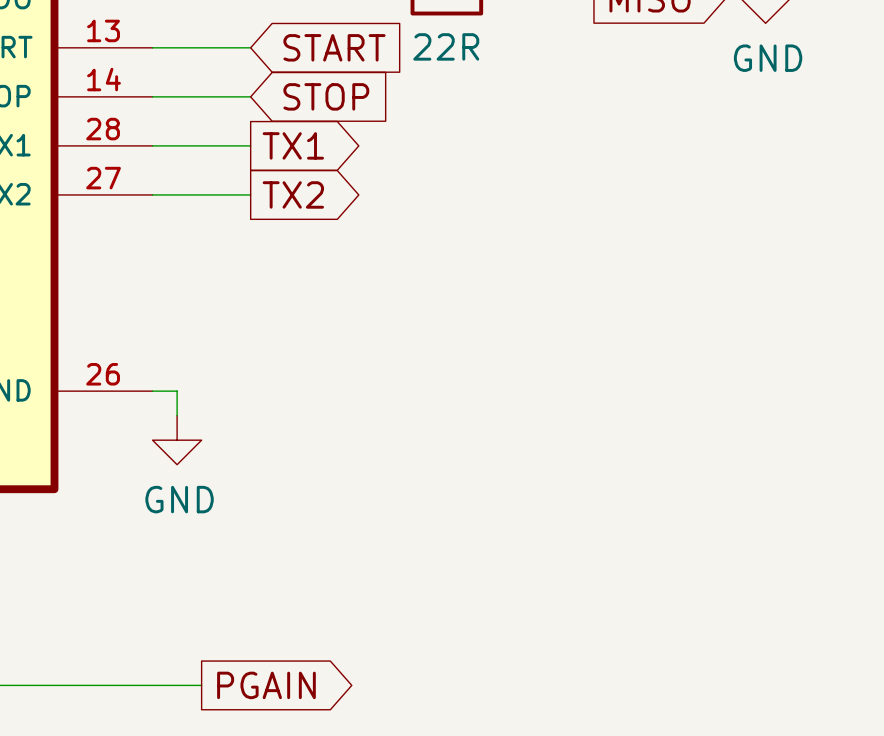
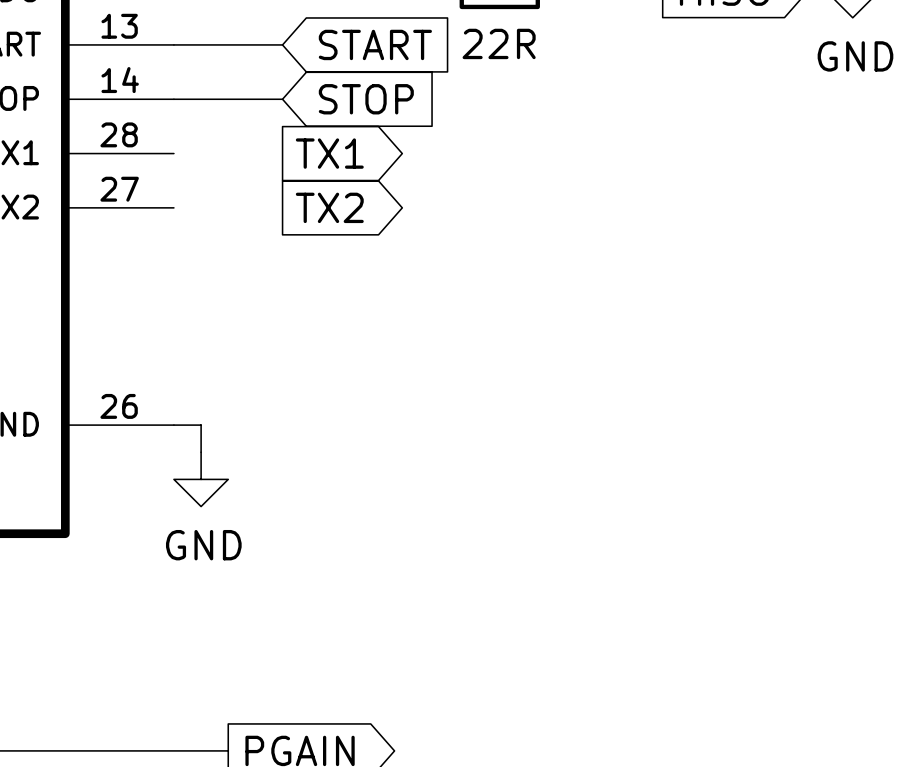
wire: (152, 145) (250, 145) -> none
wire: (152, 194) (250, 194) -> none

